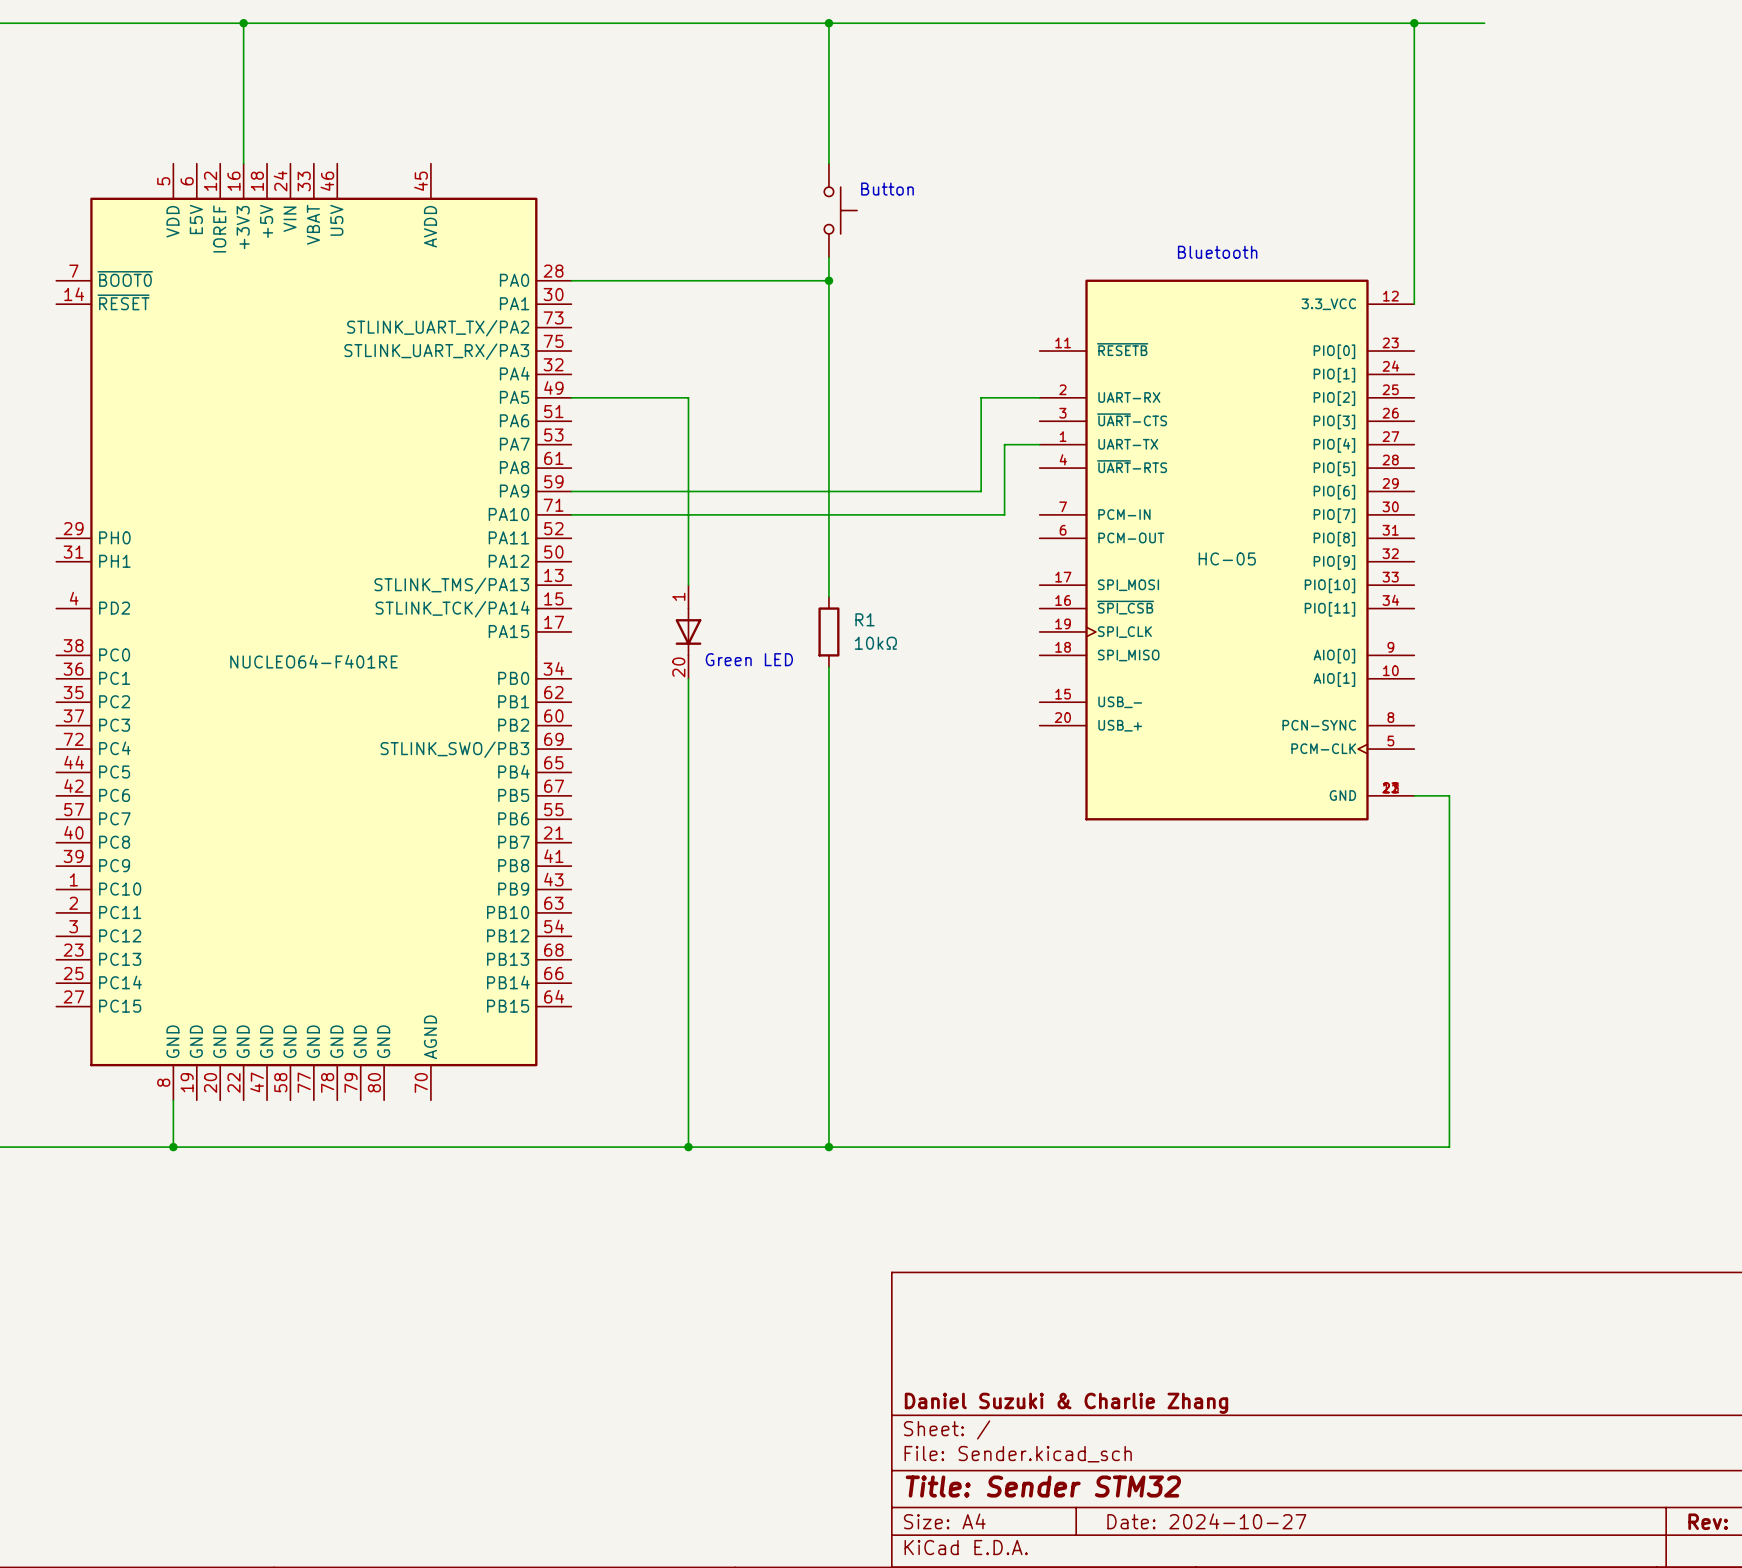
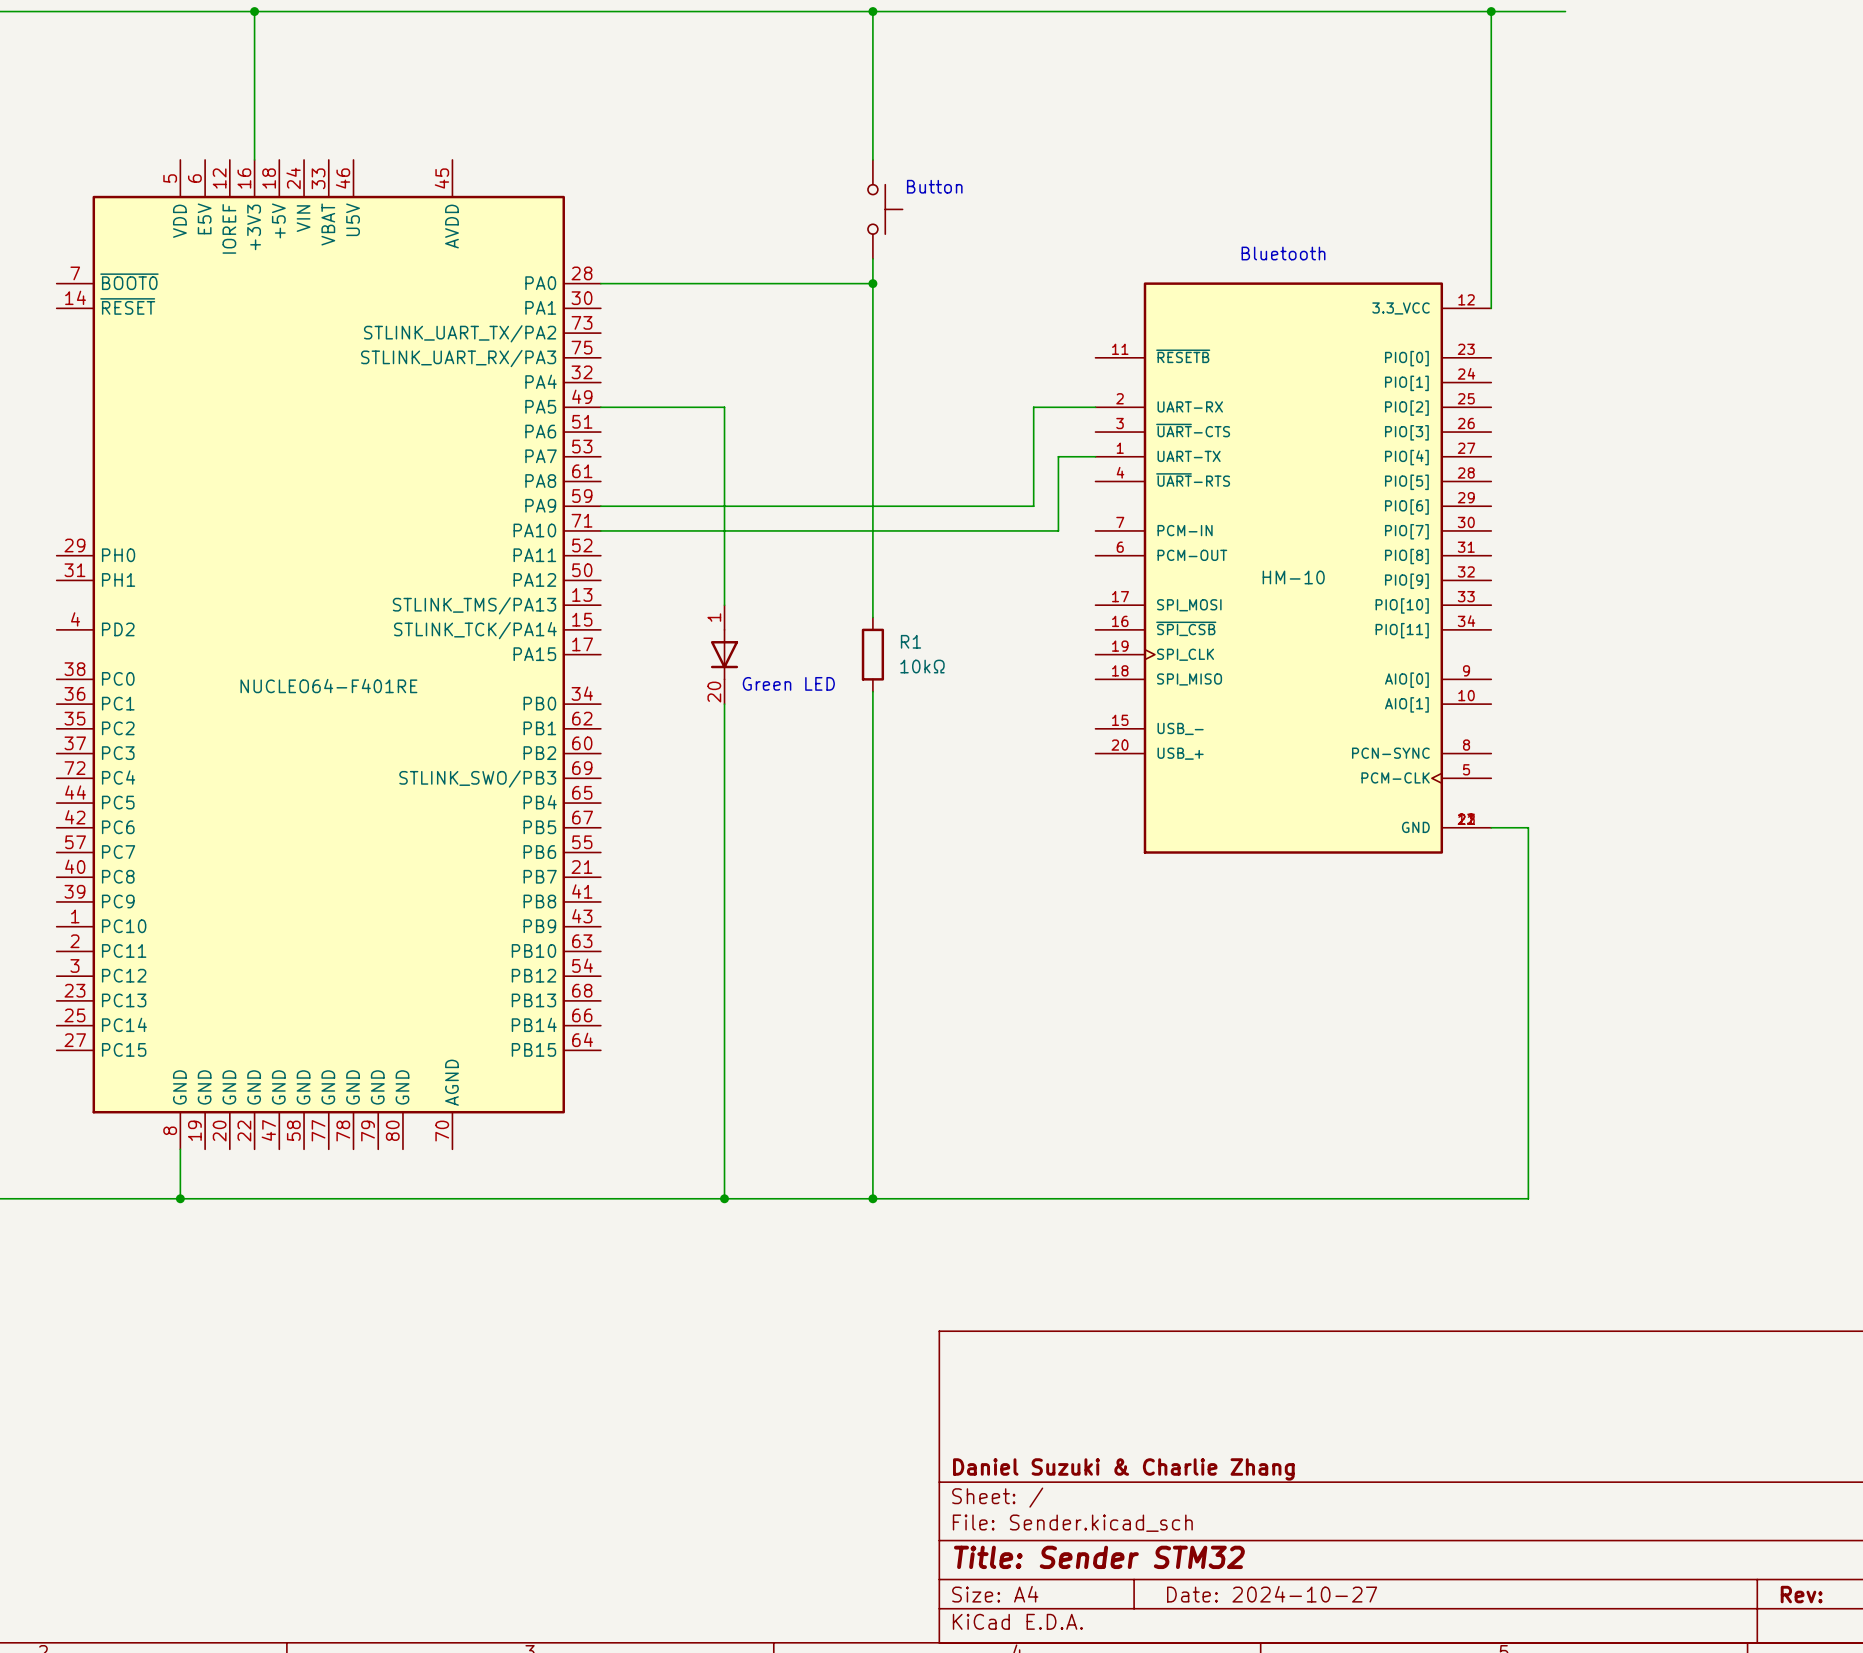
part value: HC-05 (1227, 558) -> HM-10 (1293, 577)

